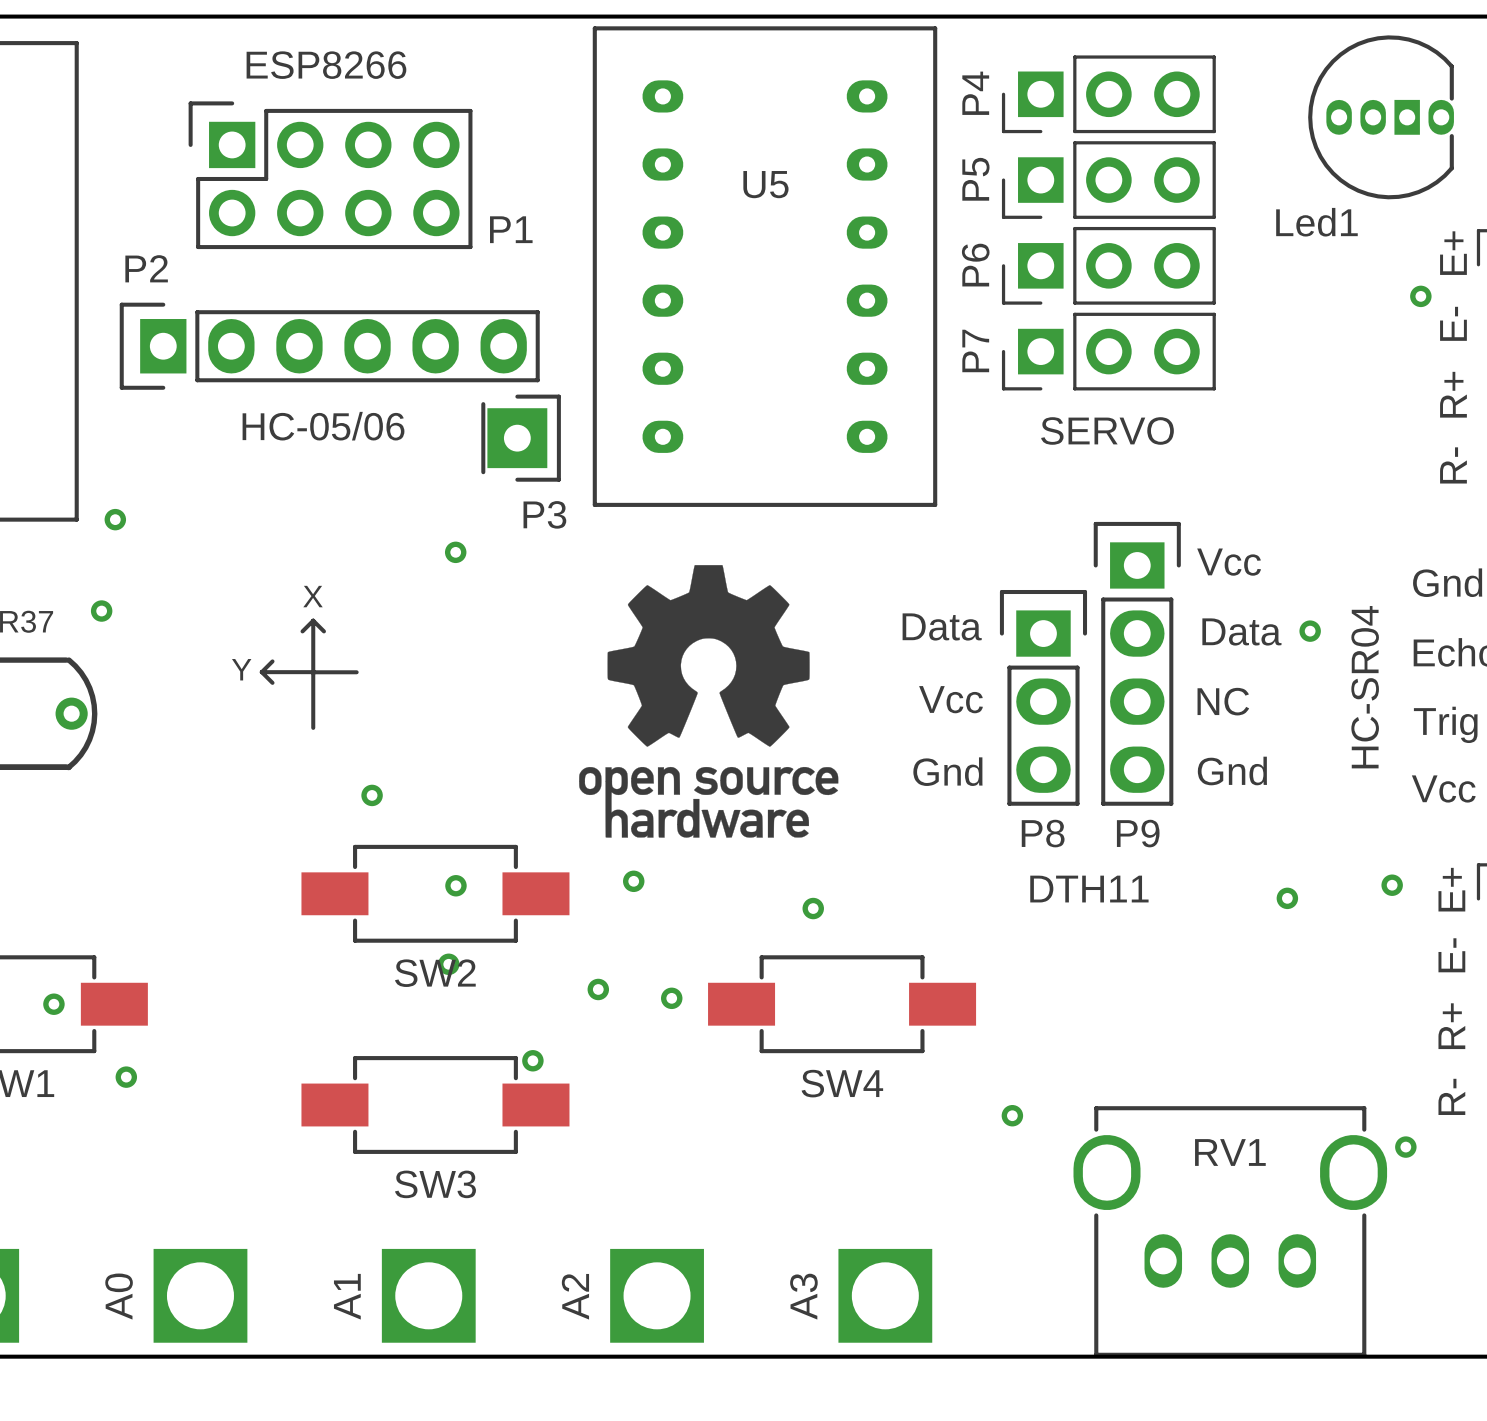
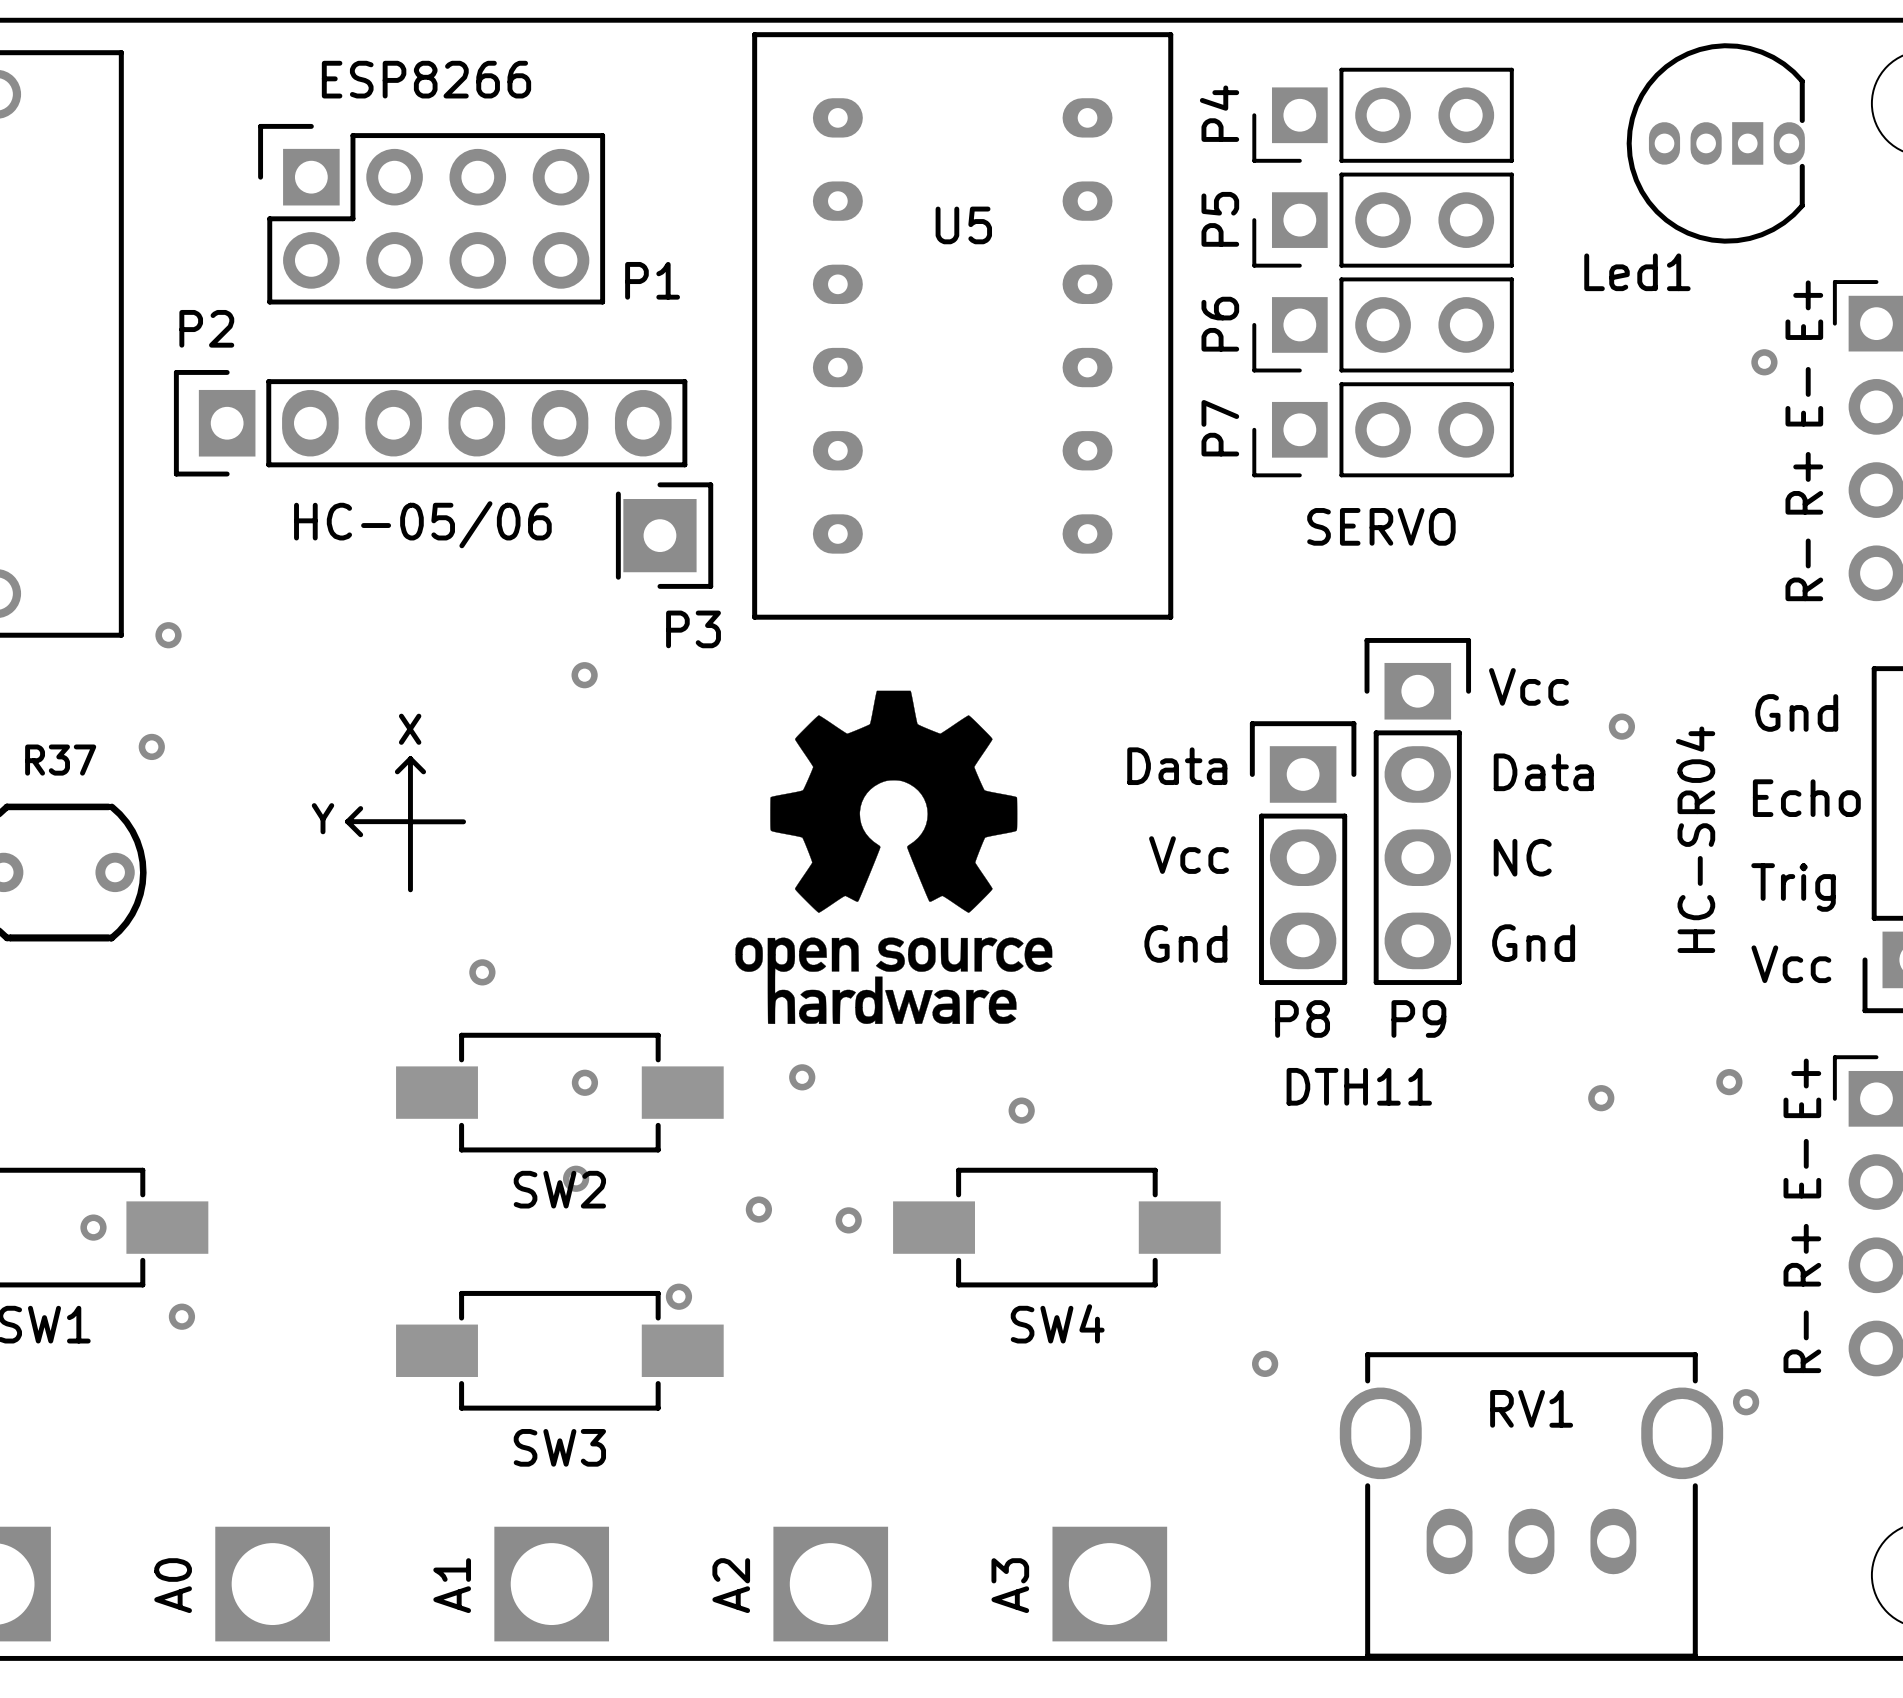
part position: (1310, 631) -> (1621, 726)

